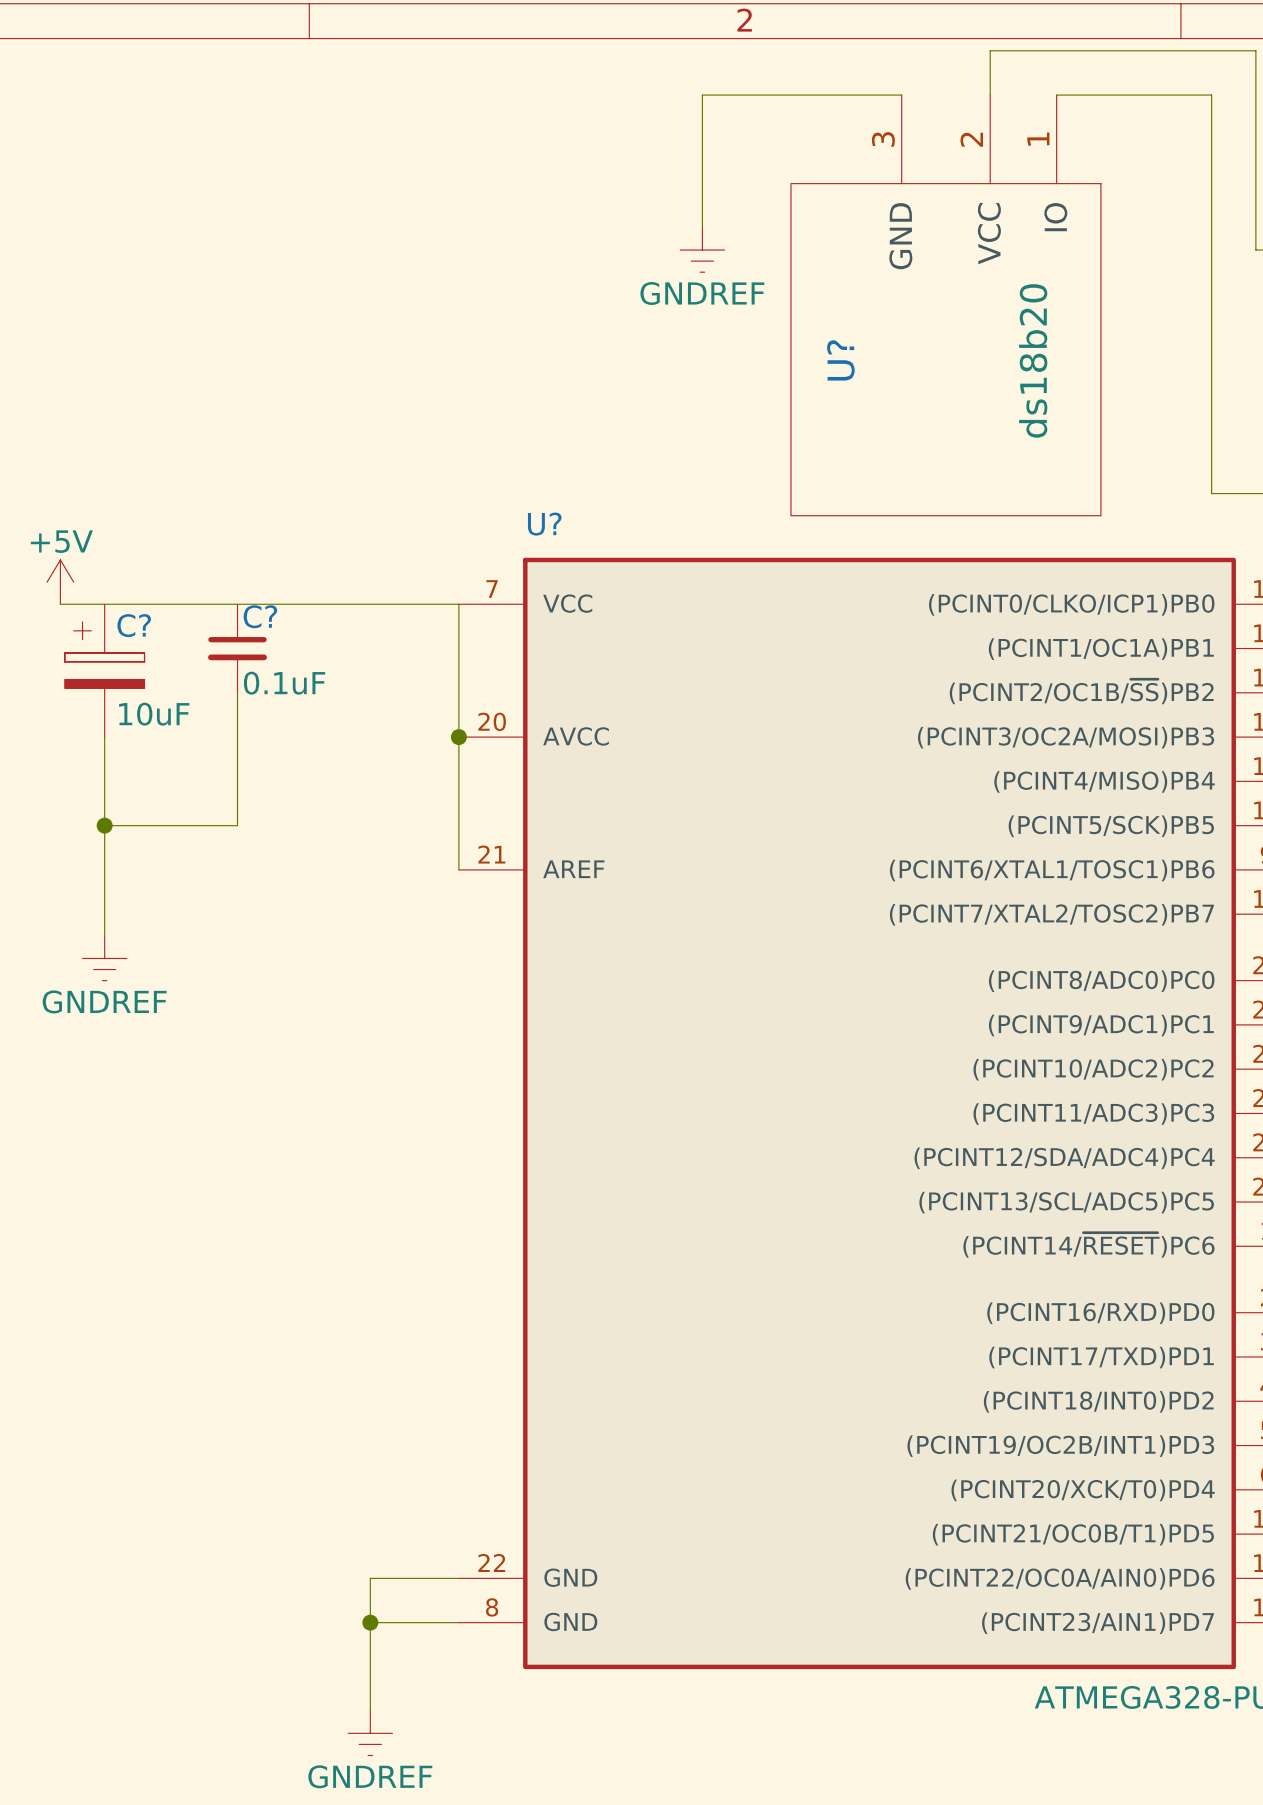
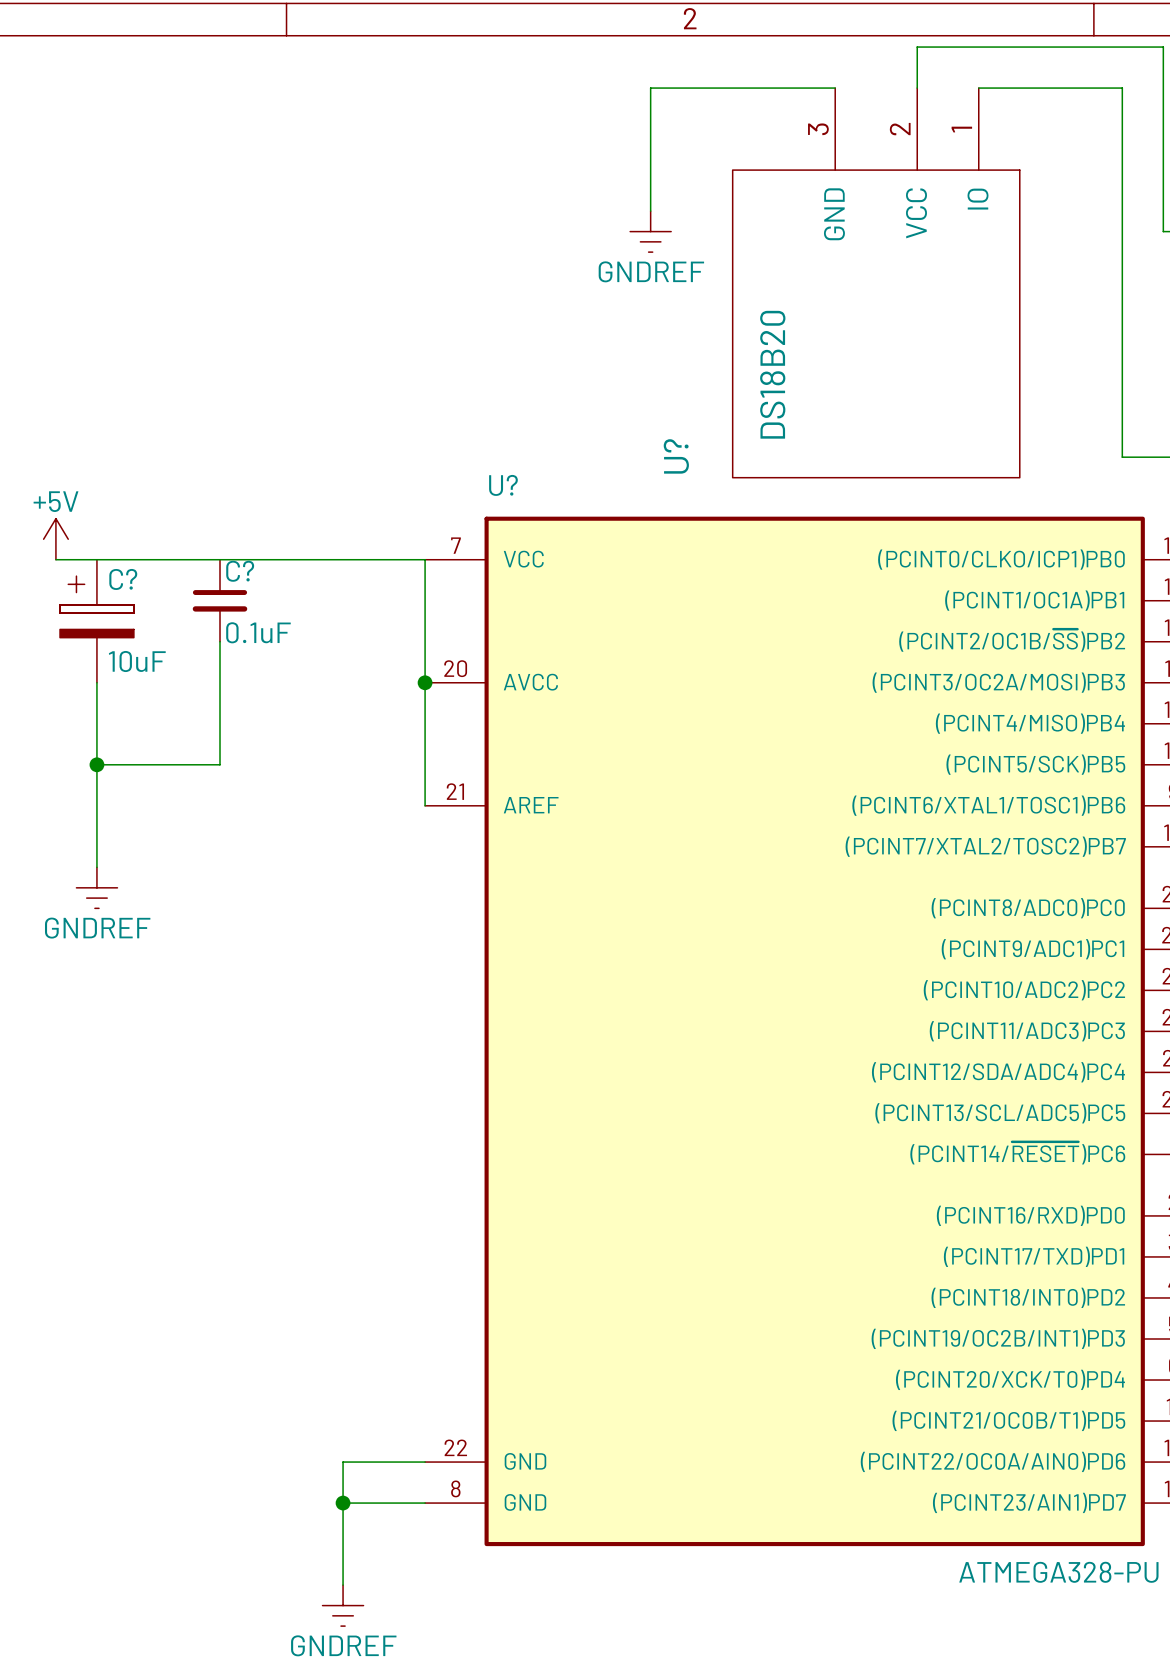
U? name position: U? (840, 360) -> U? (676, 456)
U? value: ds18b20 (1033, 360) -> DS18B20 (772, 374)

